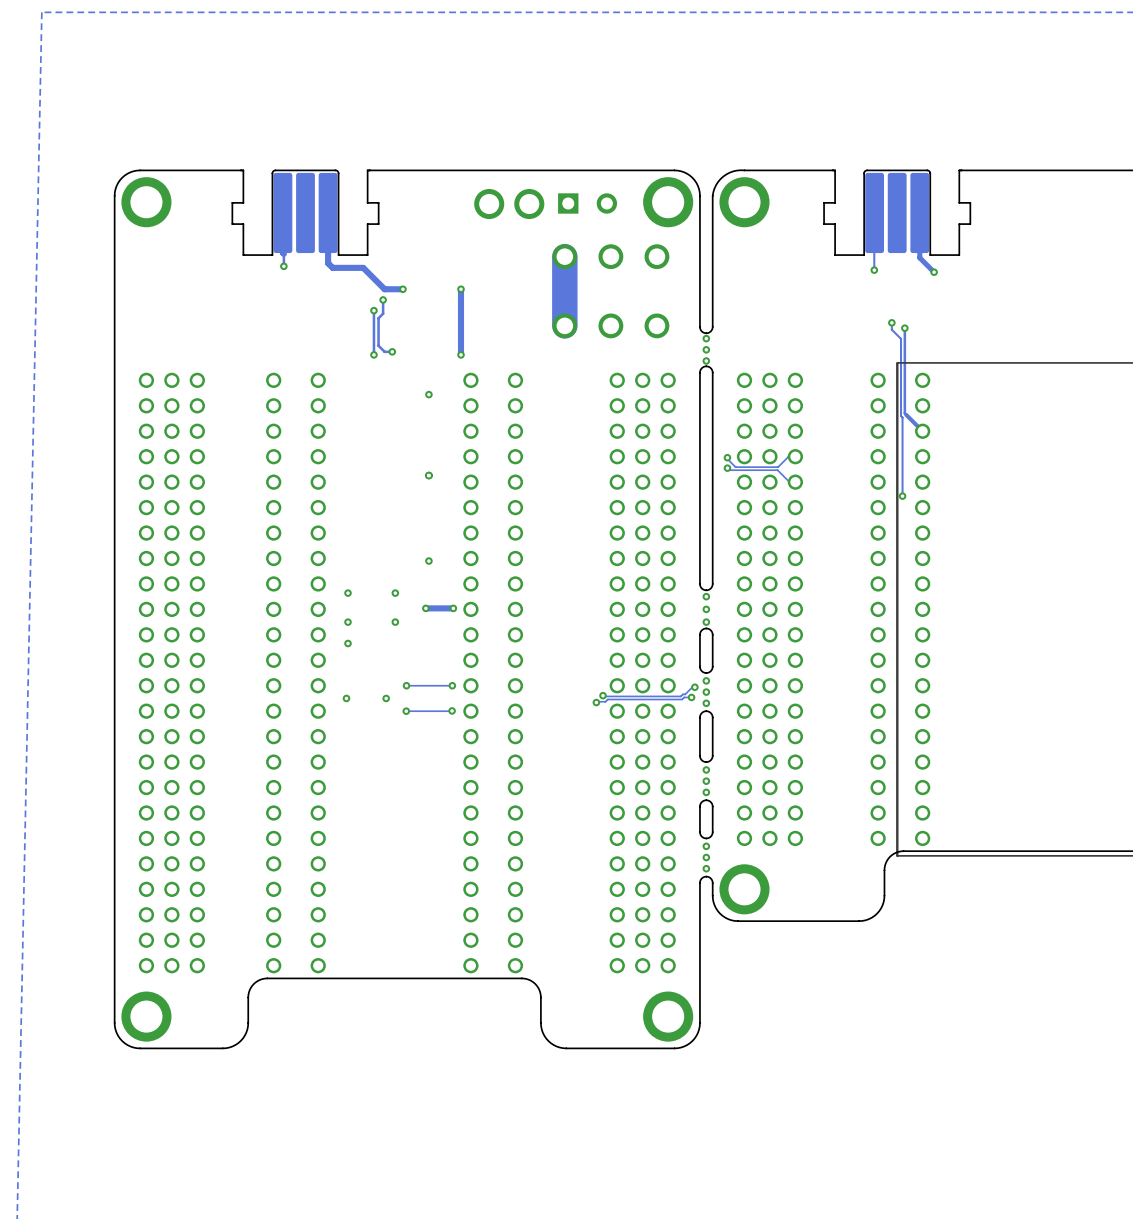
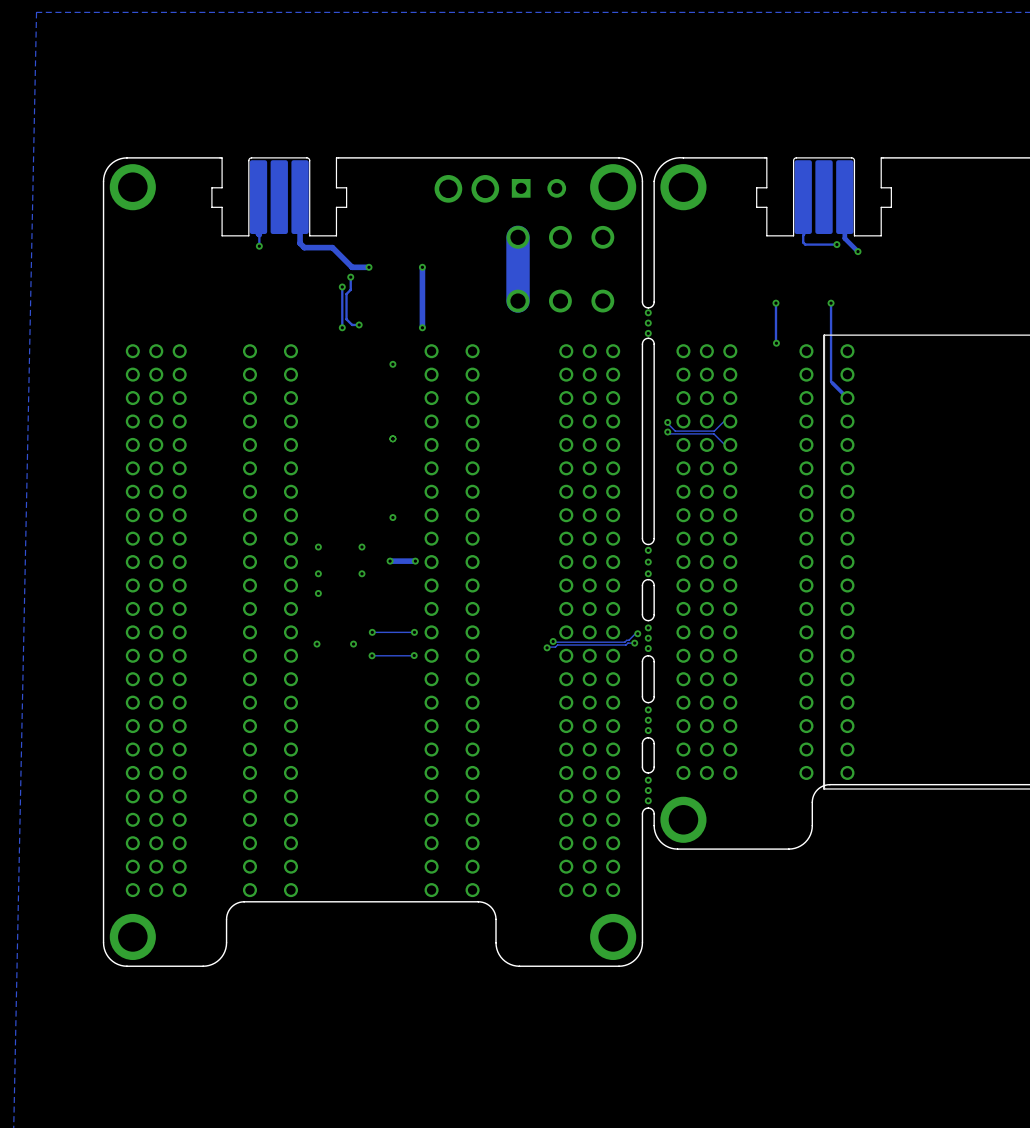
track: (874, 251) (874, 270) -> none
track: none -> (804, 233) (803, 242) (805, 244) (836, 244)
via: none -> (836, 244)
via: (874, 270) -> none
track: (891, 322) (891, 329) (901, 338) (902, 496) -> none
via: (891, 322) -> none
track: none -> (775, 303) (776, 343)
via: none -> (775, 303)
via: none -> (776, 343)
via: (902, 496) -> none

